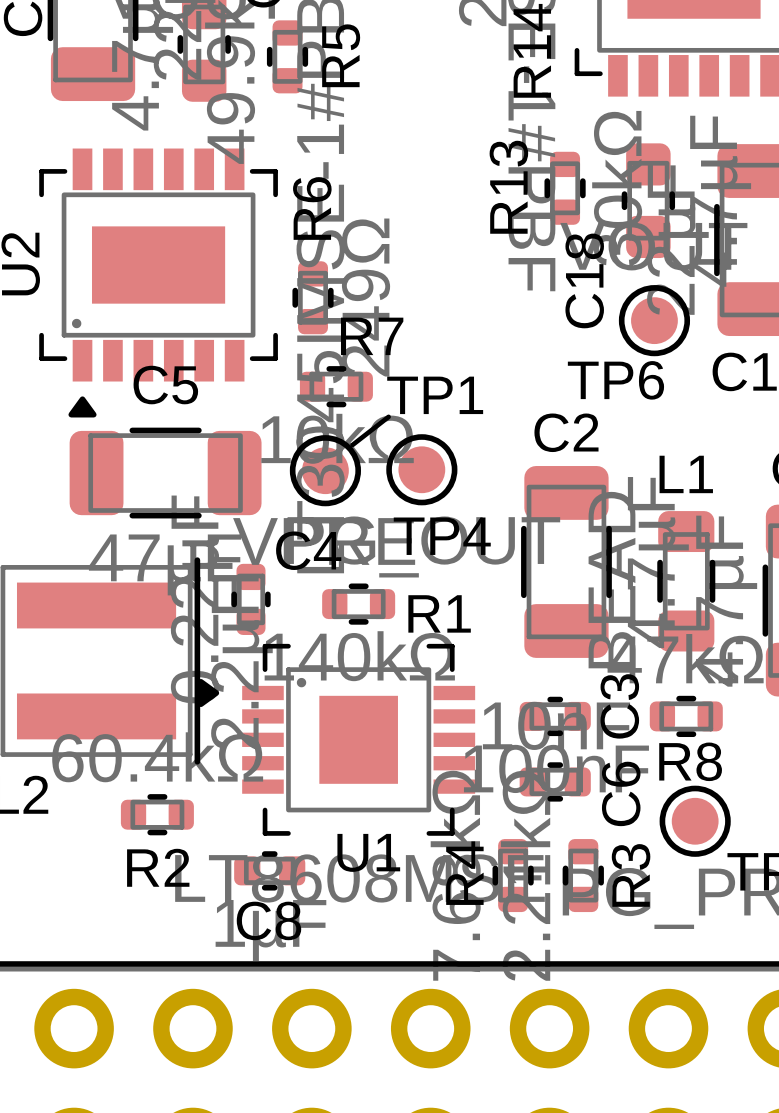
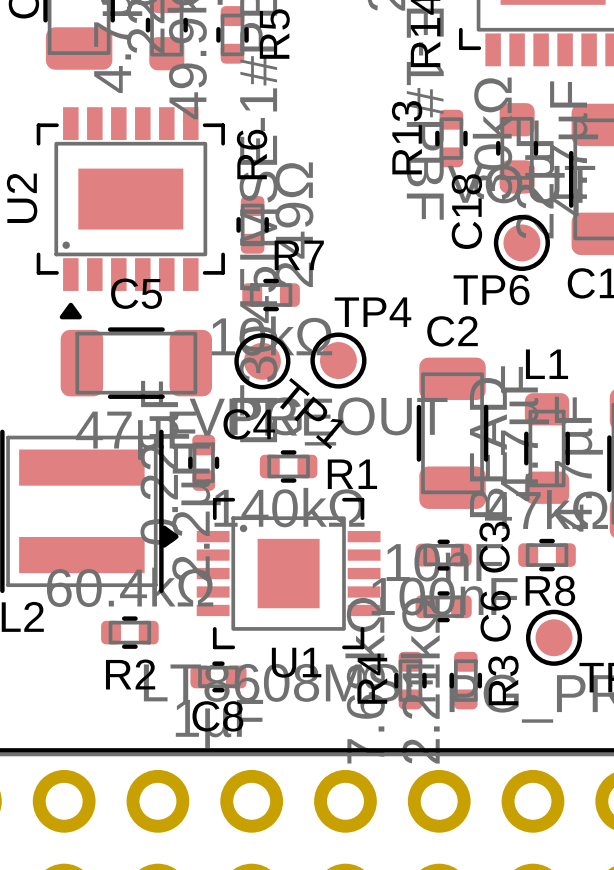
TP1 name rotation: 0° (435, 395) -> 40° clockwise (311, 413)
TP1 name position: TP1 (435, 395) -> TP1 (311, 413)
line: (388, 416) (352, 444) -> none
TP4 name position: TP4 (442, 536) -> TP4 (373, 312)

